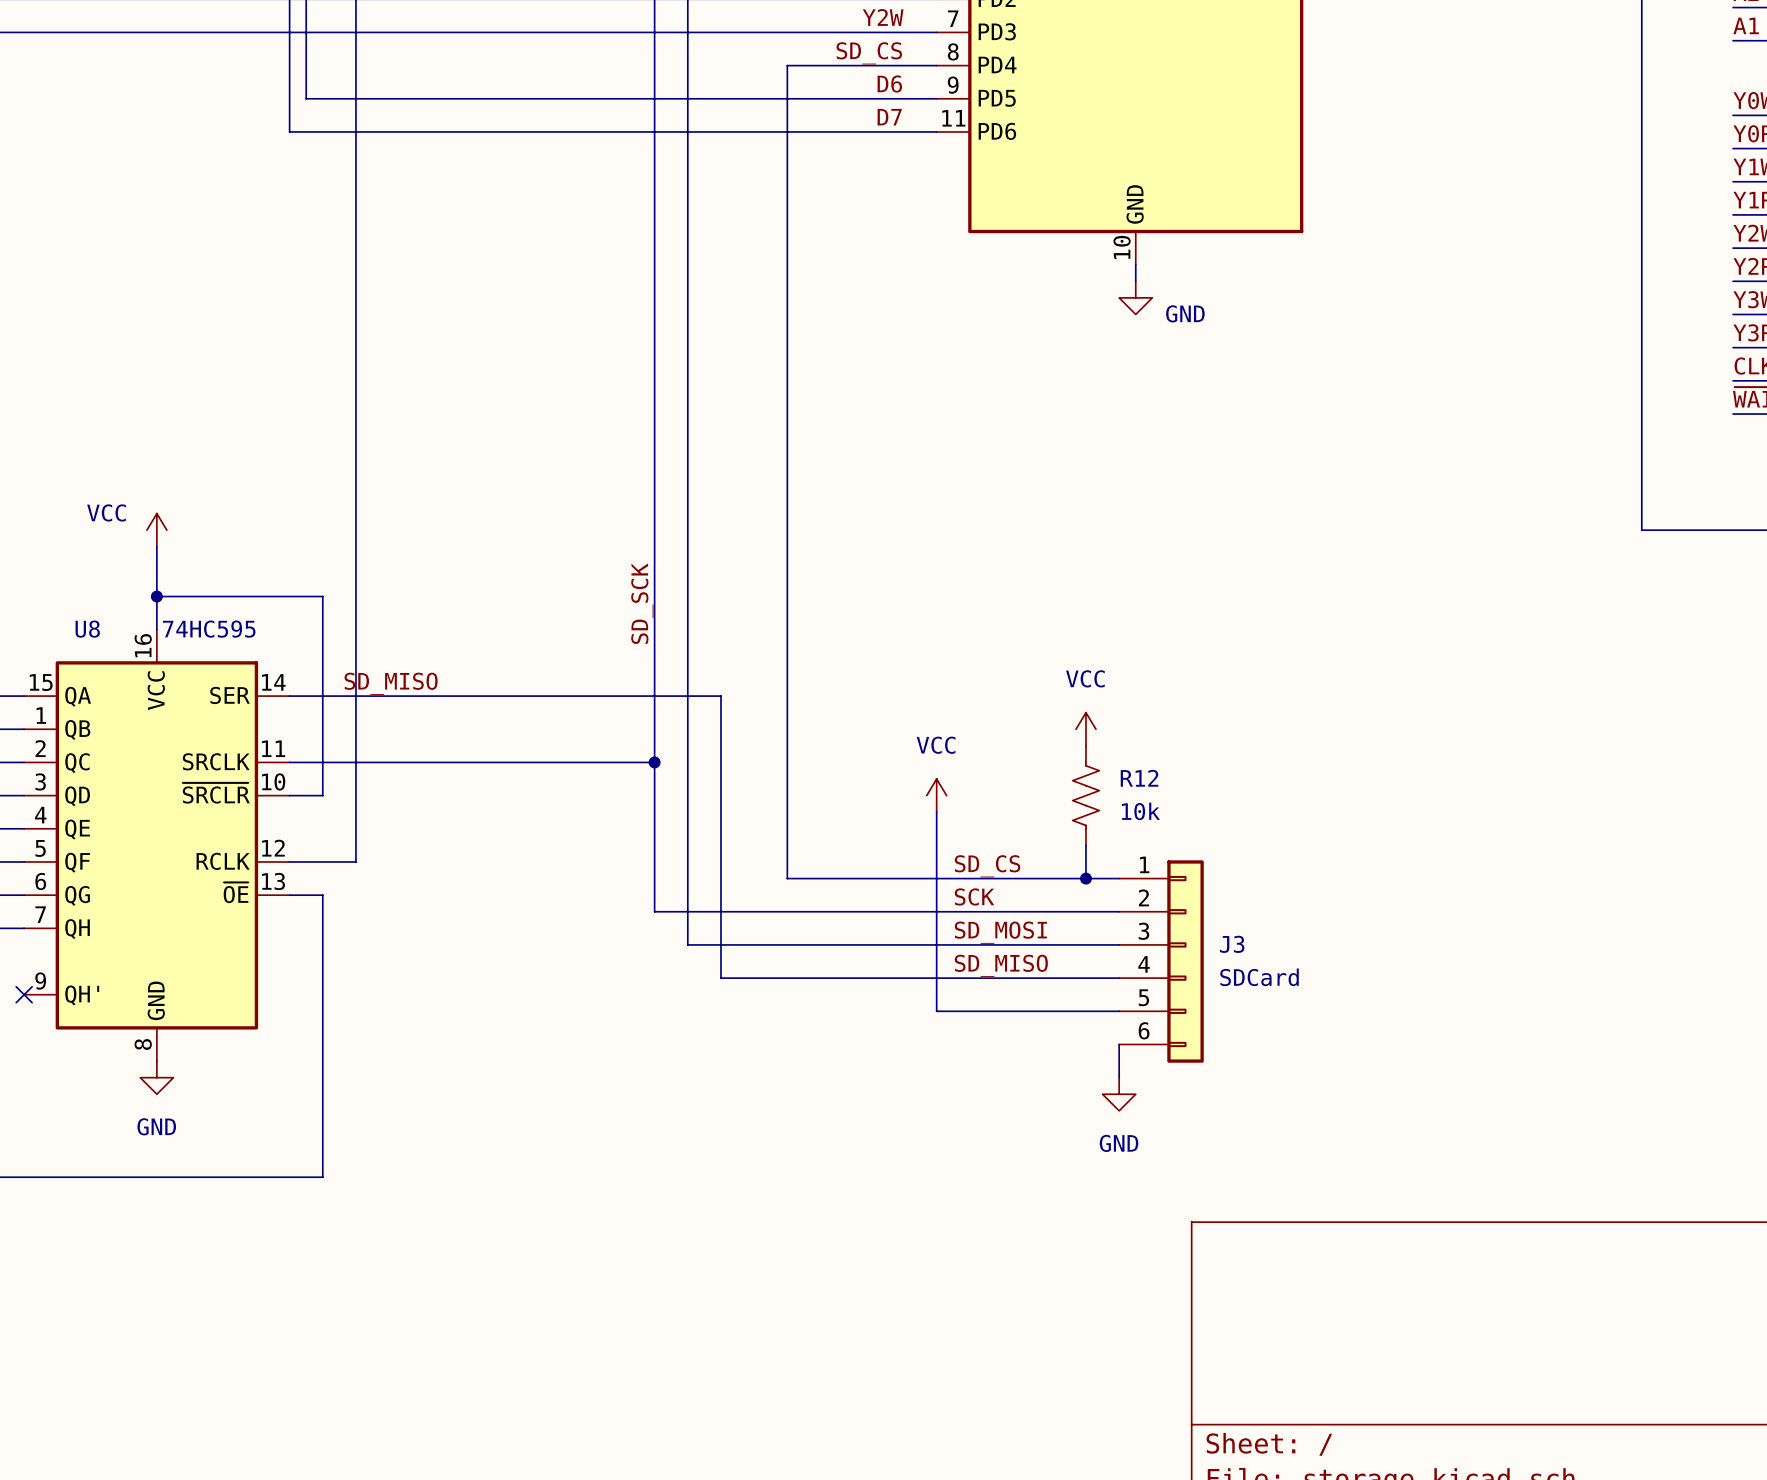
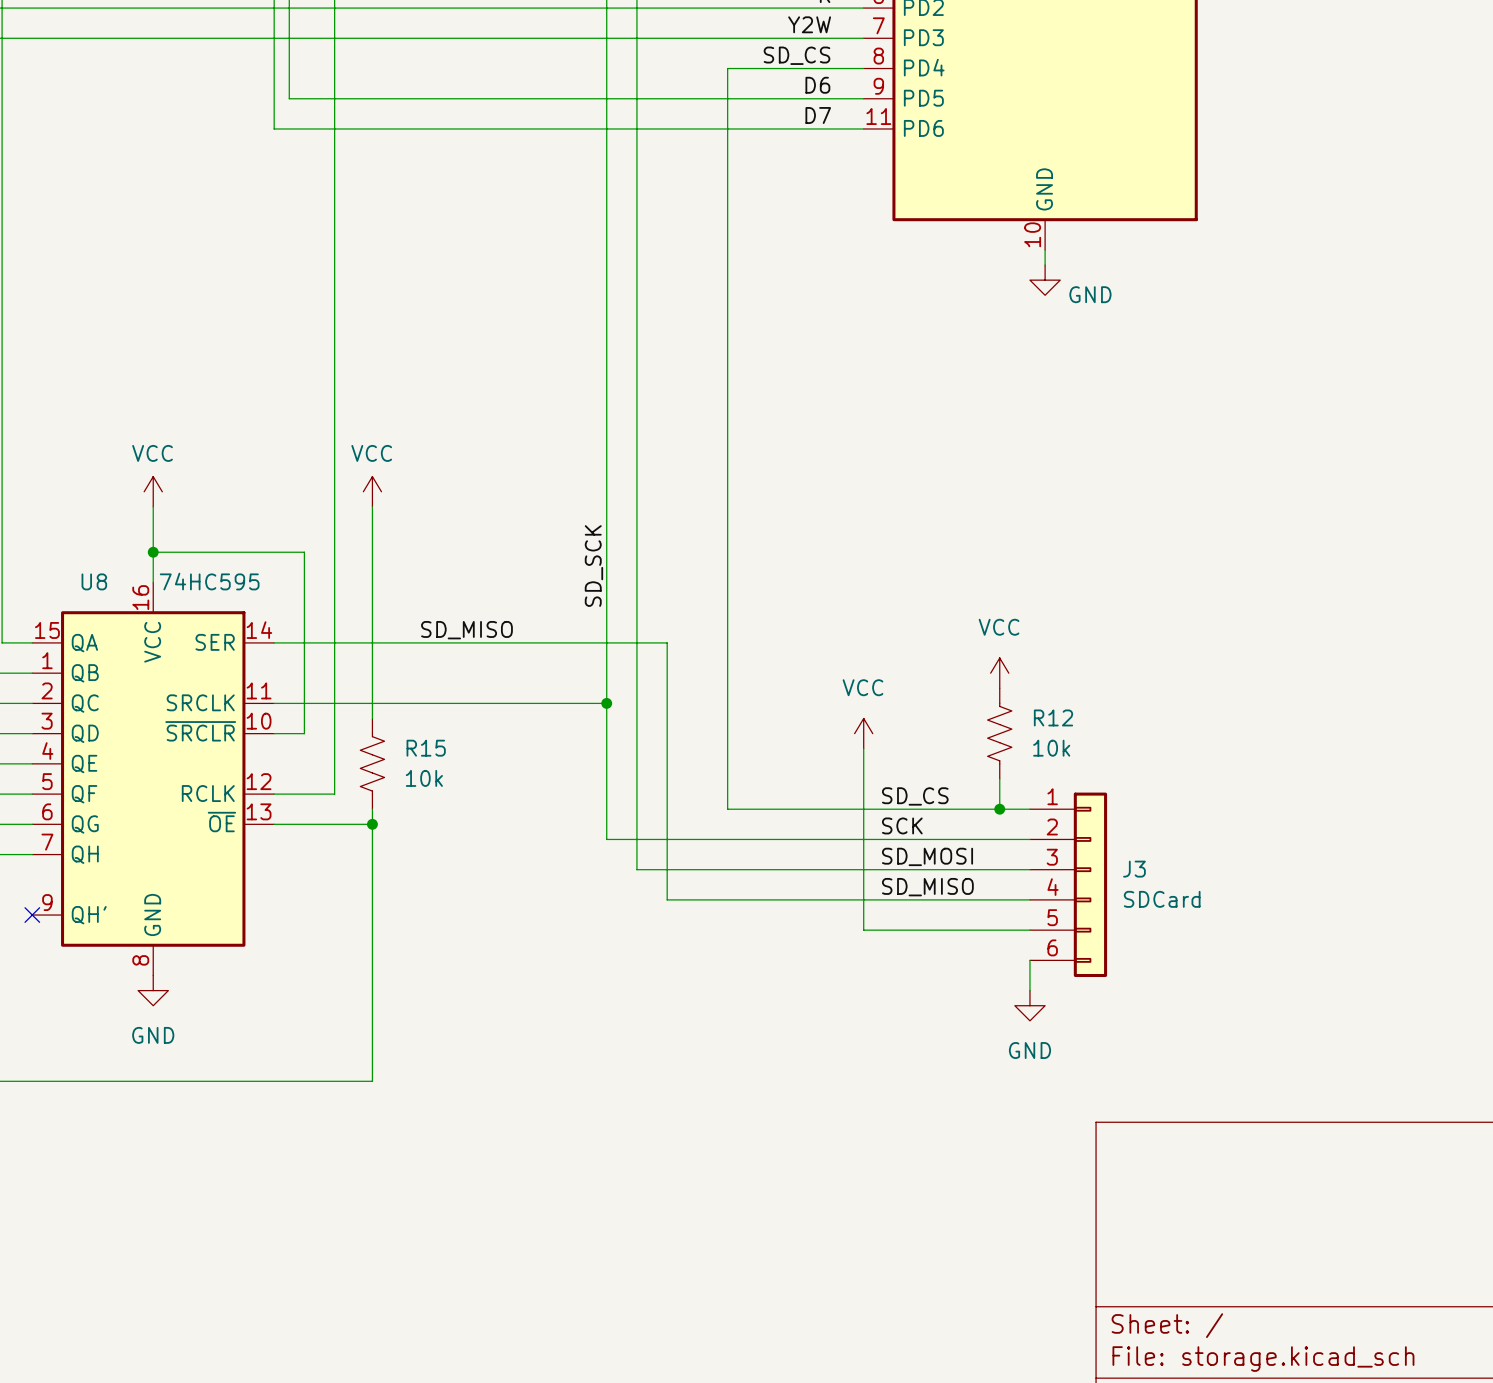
power symbol text position: VCC (106, 512) -> VCC (152, 453)
power symbol: none -> VCC (372, 491)
wire: none -> (372, 506) (372, 718)
label position: SD_MISO (391, 683) -> SD_MISO (466, 630)
R15: none -> 10k (372, 763)
wire: (322, 895) (322, 1177) -> (372, 809) (372, 1081) (304, 1081)
wire: none -> (304, 824) (372, 824)
junction: none -> (372, 824)

